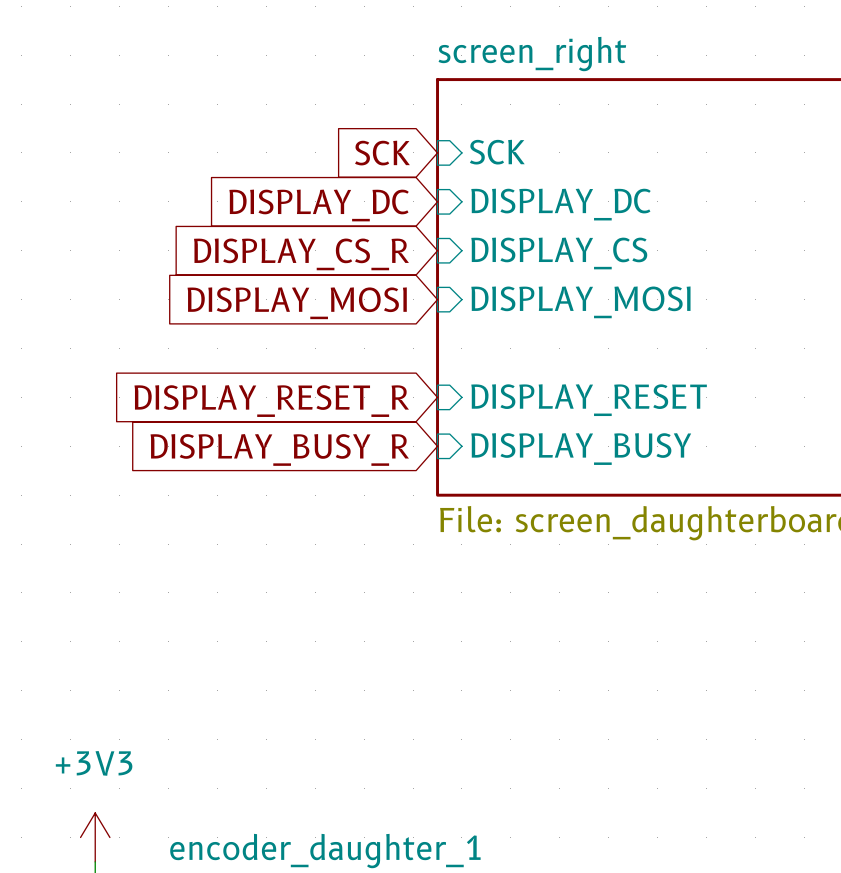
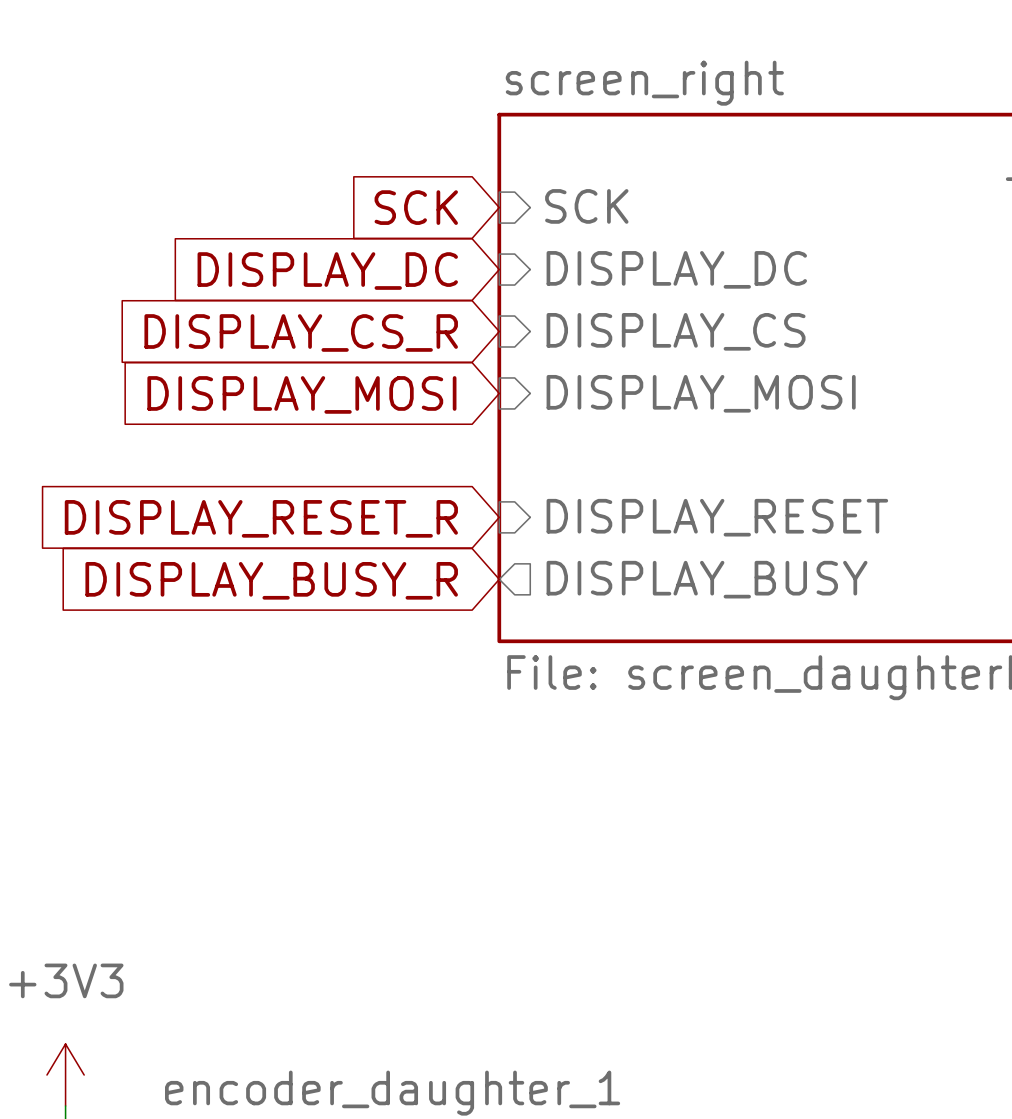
sheet pin shape: input (581, 449) -> output (707, 579)

